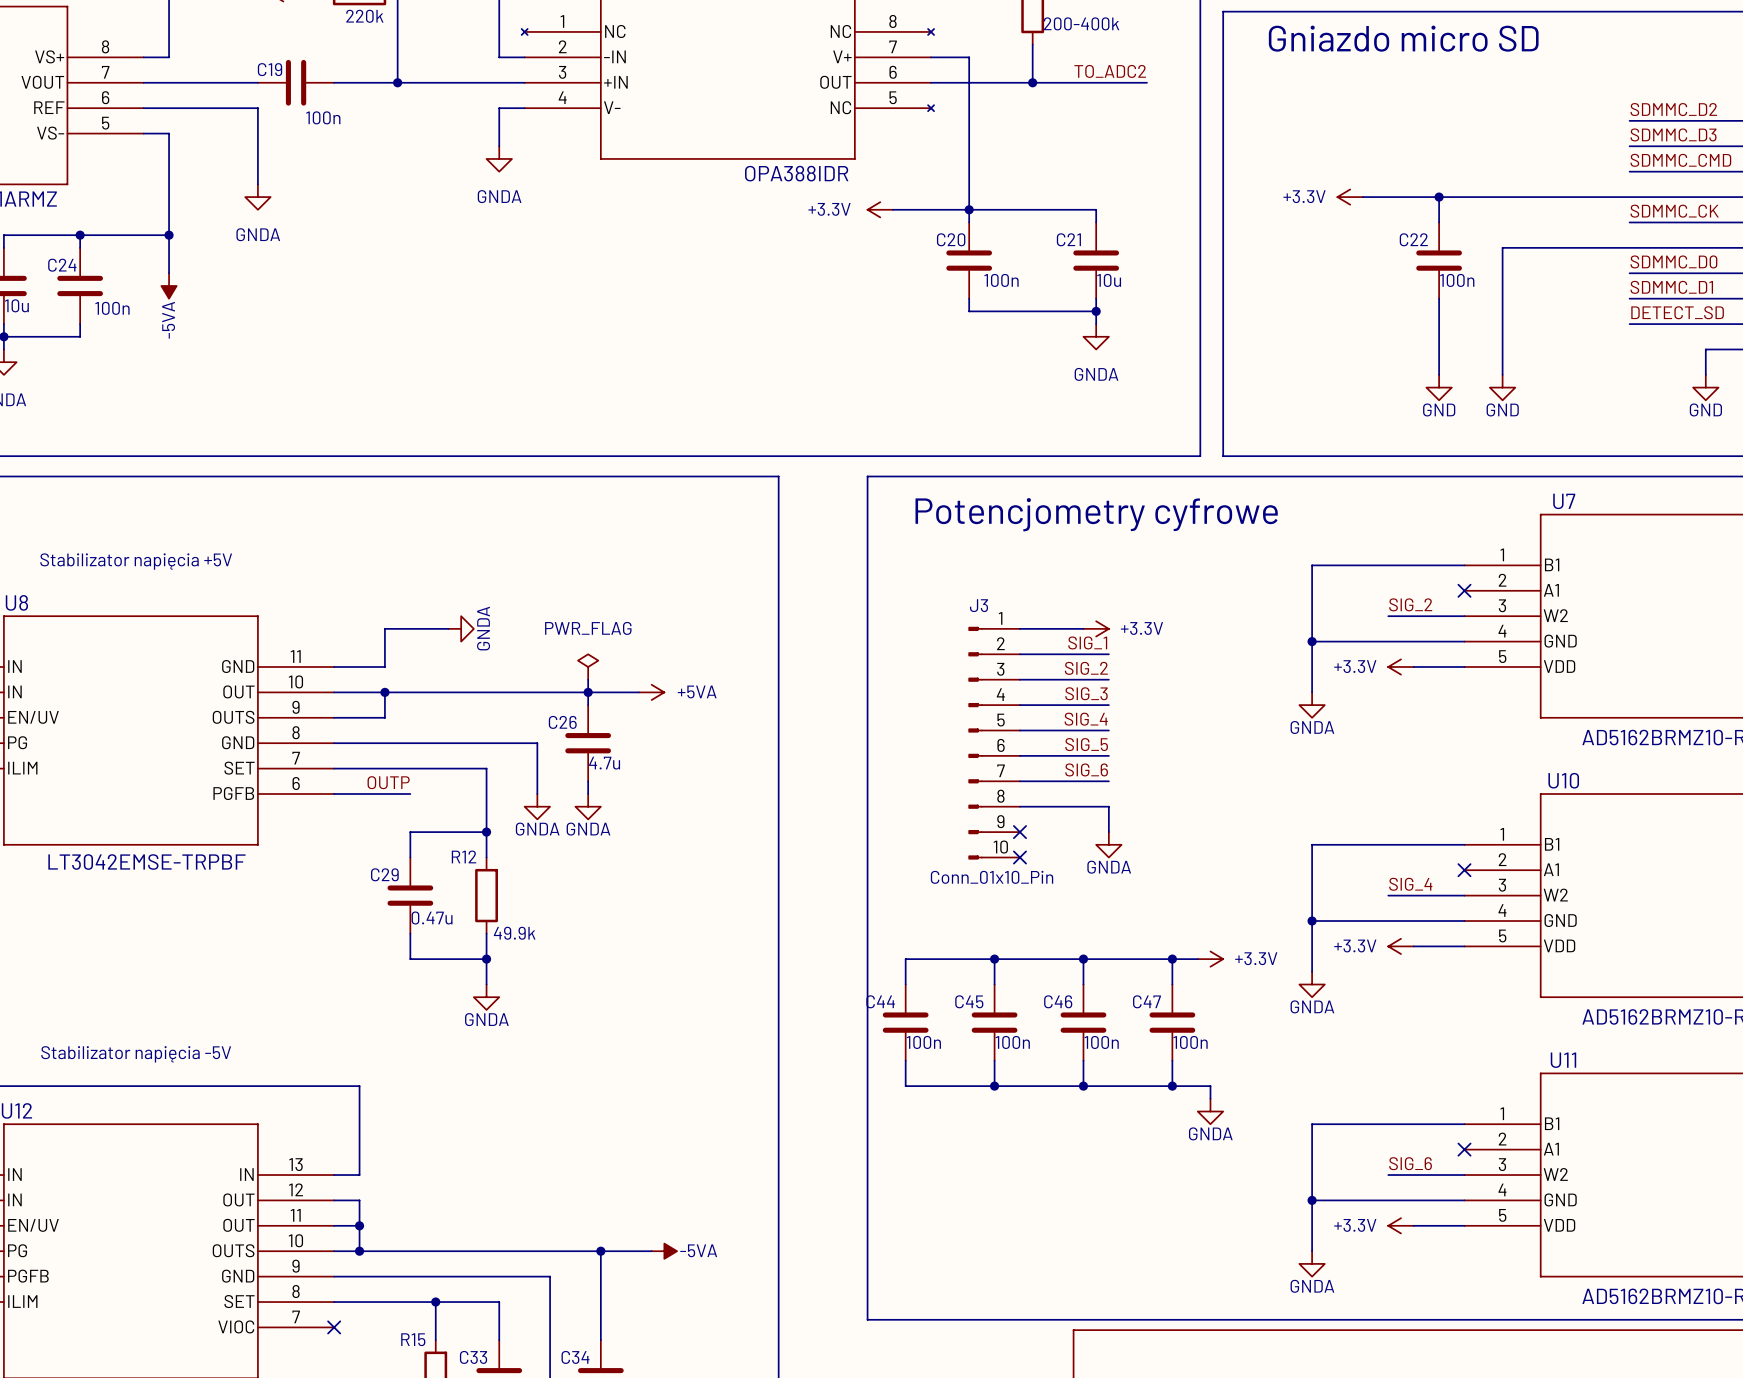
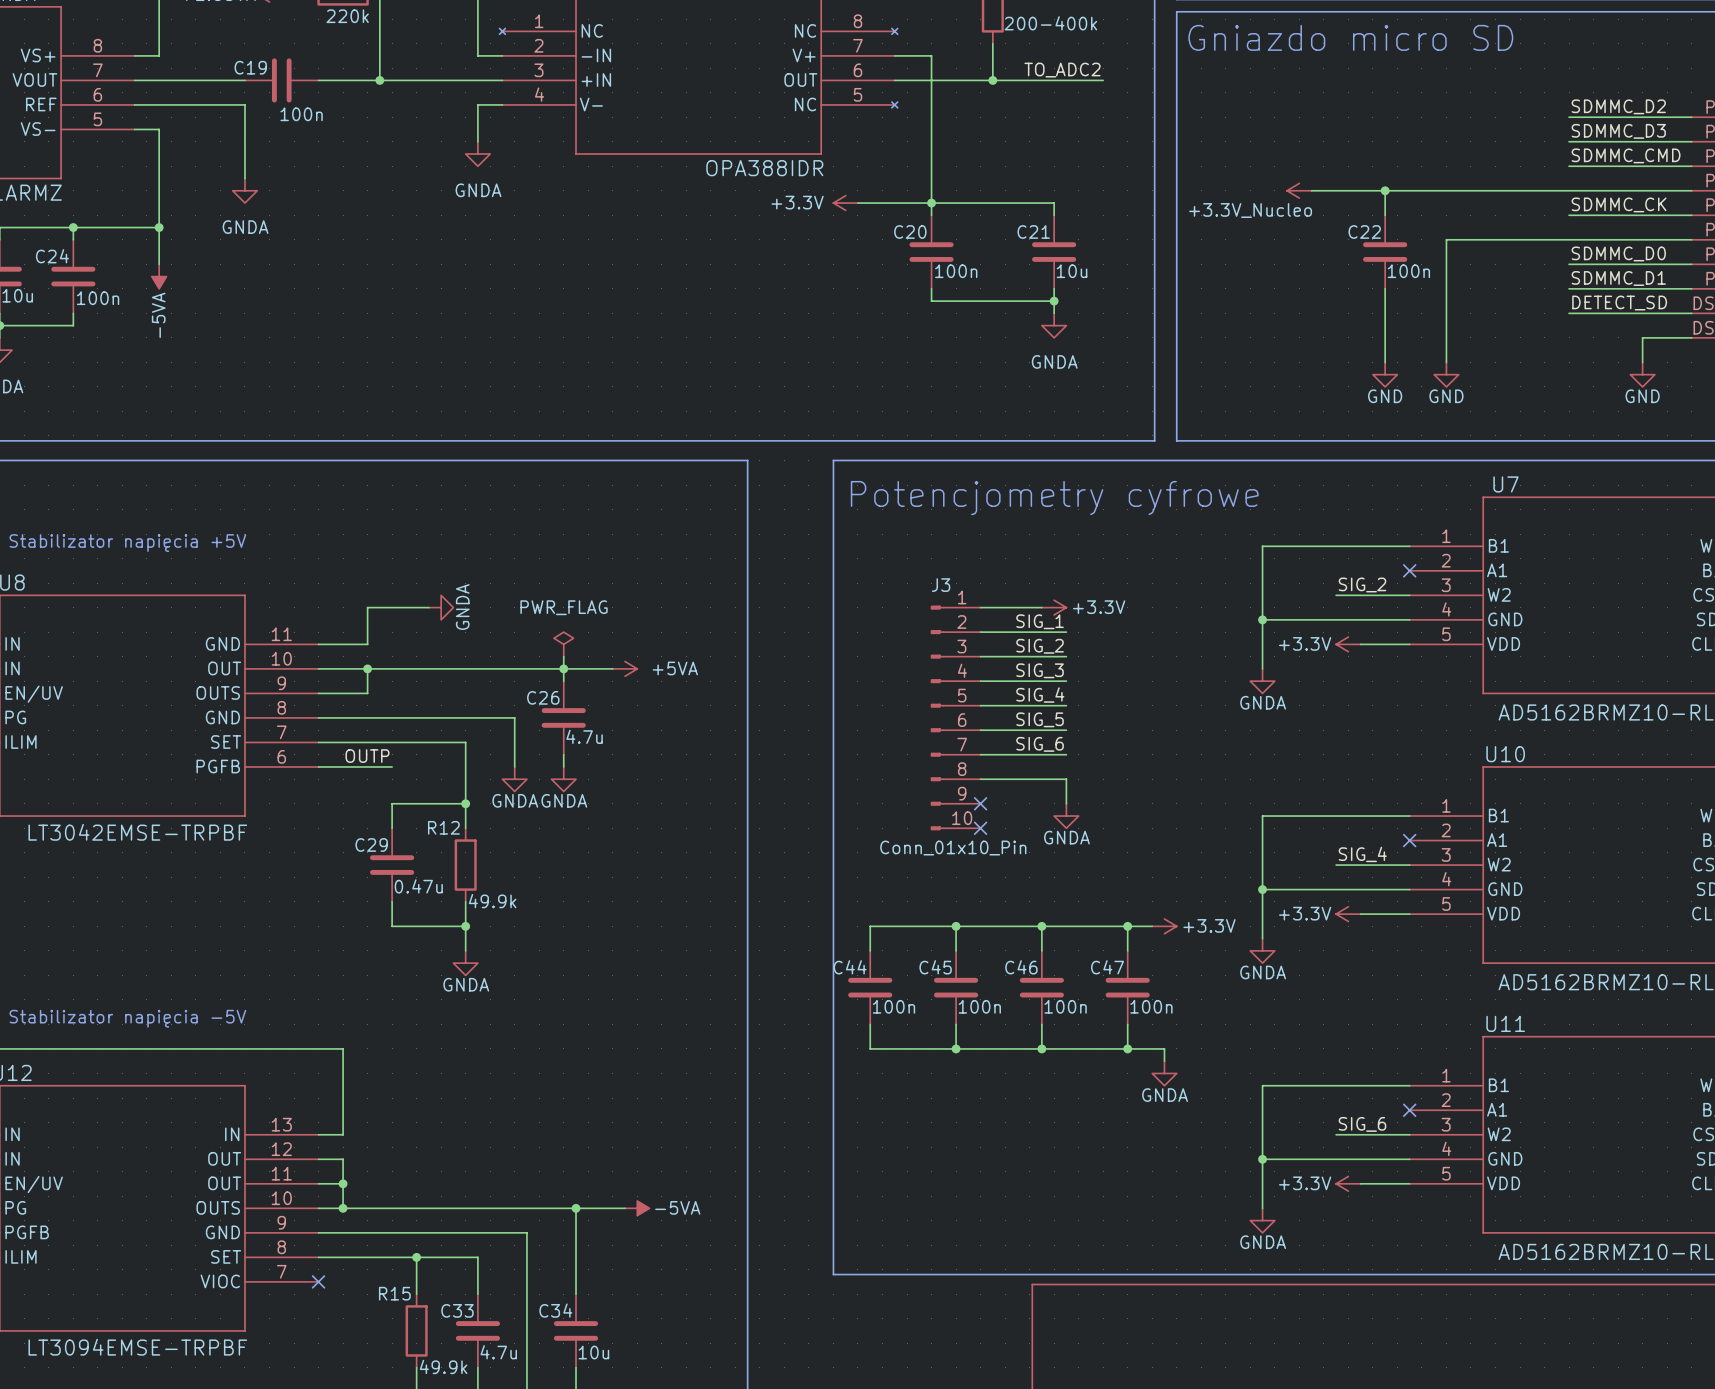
power symbol: +3.3V (1350, 197) -> +3.3V_Nucleo (1299, 190)

